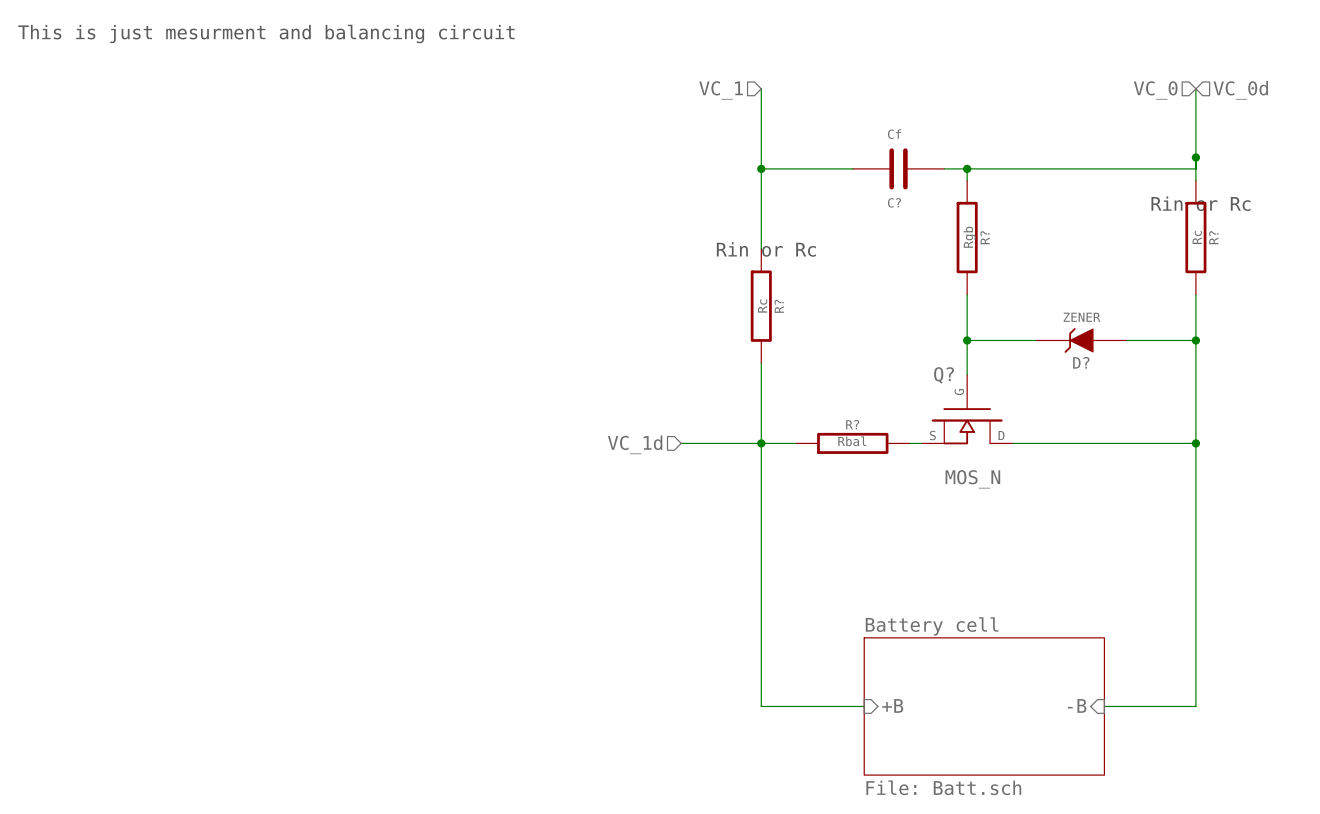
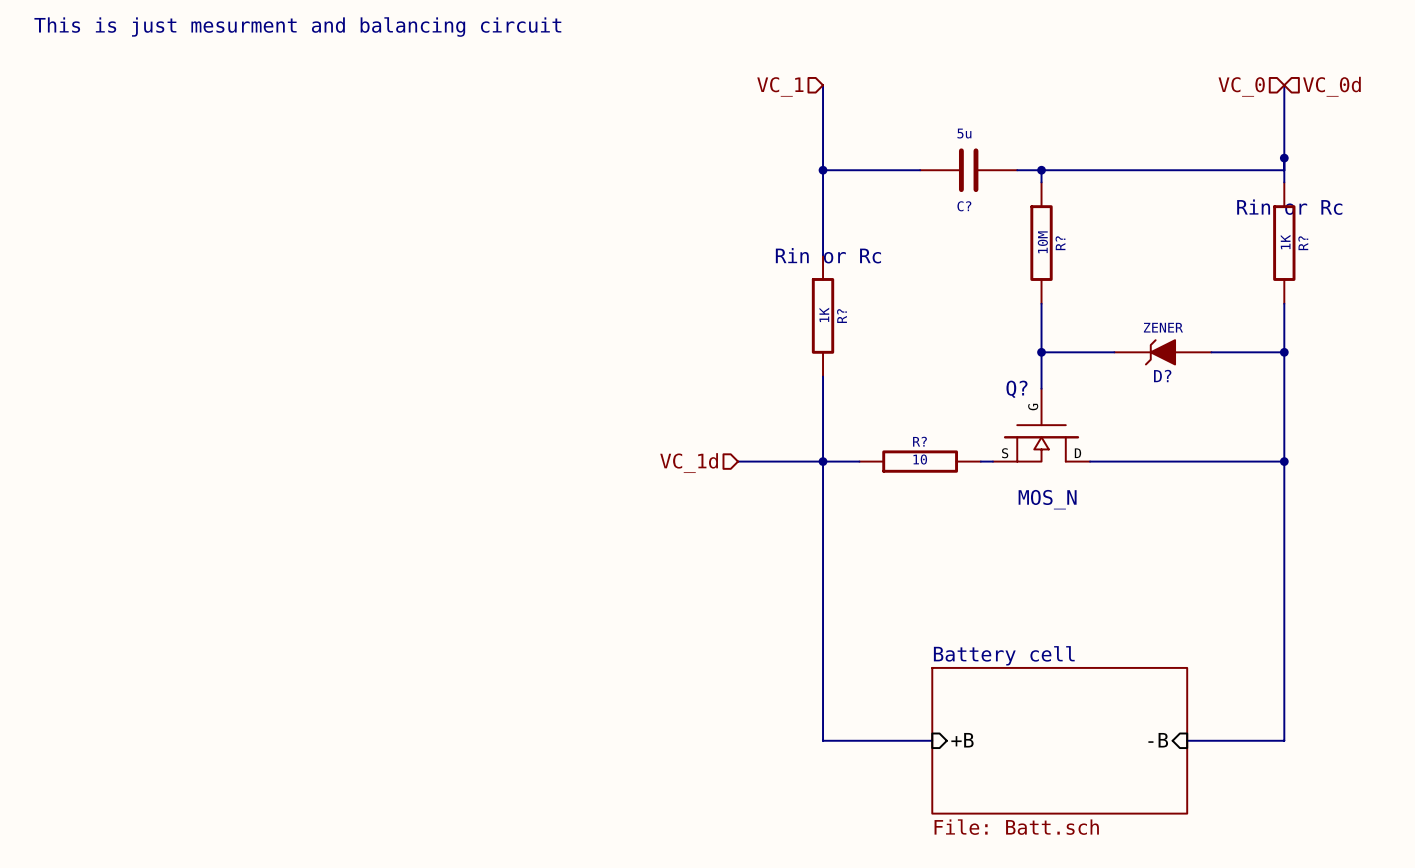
C? value: Cf (894, 134) -> 5u (964, 133)
R? value: Rgb (969, 237) -> 10M (1042, 242)
R? value: Rc (1197, 237) -> 1K (1285, 242)
R? value: Rc (762, 306) -> 1K (824, 314)
R? value: Rbal (852, 441) -> 10 (920, 459)

